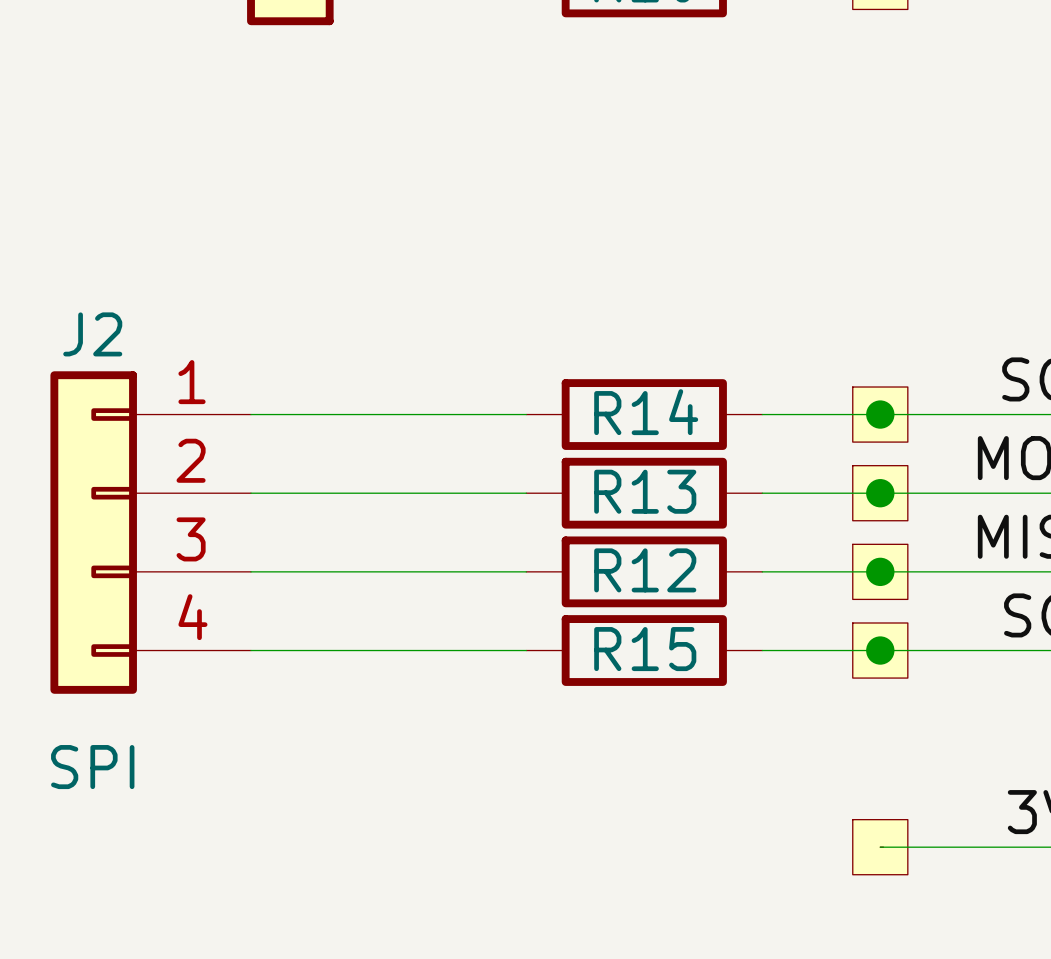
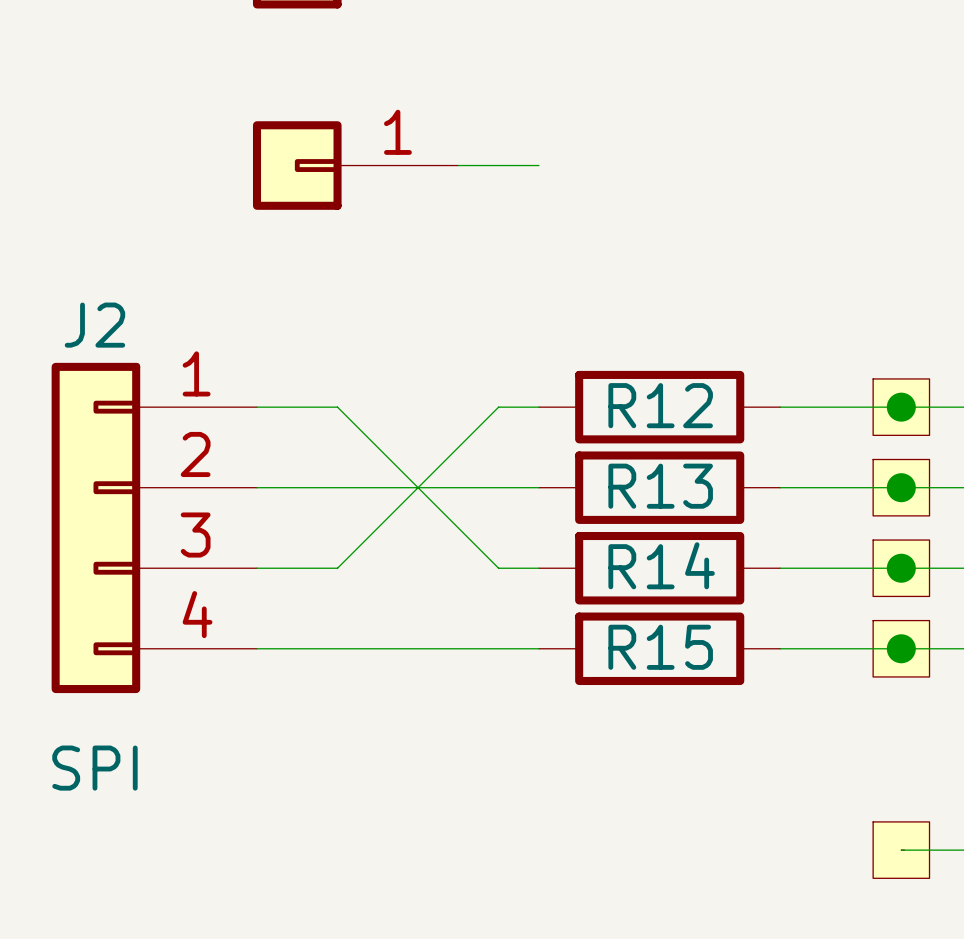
part: none -> (355, 165)
wire: none -> (458, 165) (538, 165)
R14 name: R14 (646, 412) -> R12 (660, 405)
wire: (329, 414) (486, 414) -> (337, 407) (498, 568)
R12 name: R12 (645, 570) -> R14 (661, 565)
wire: (329, 571) (486, 571) -> (337, 568) (498, 407)

